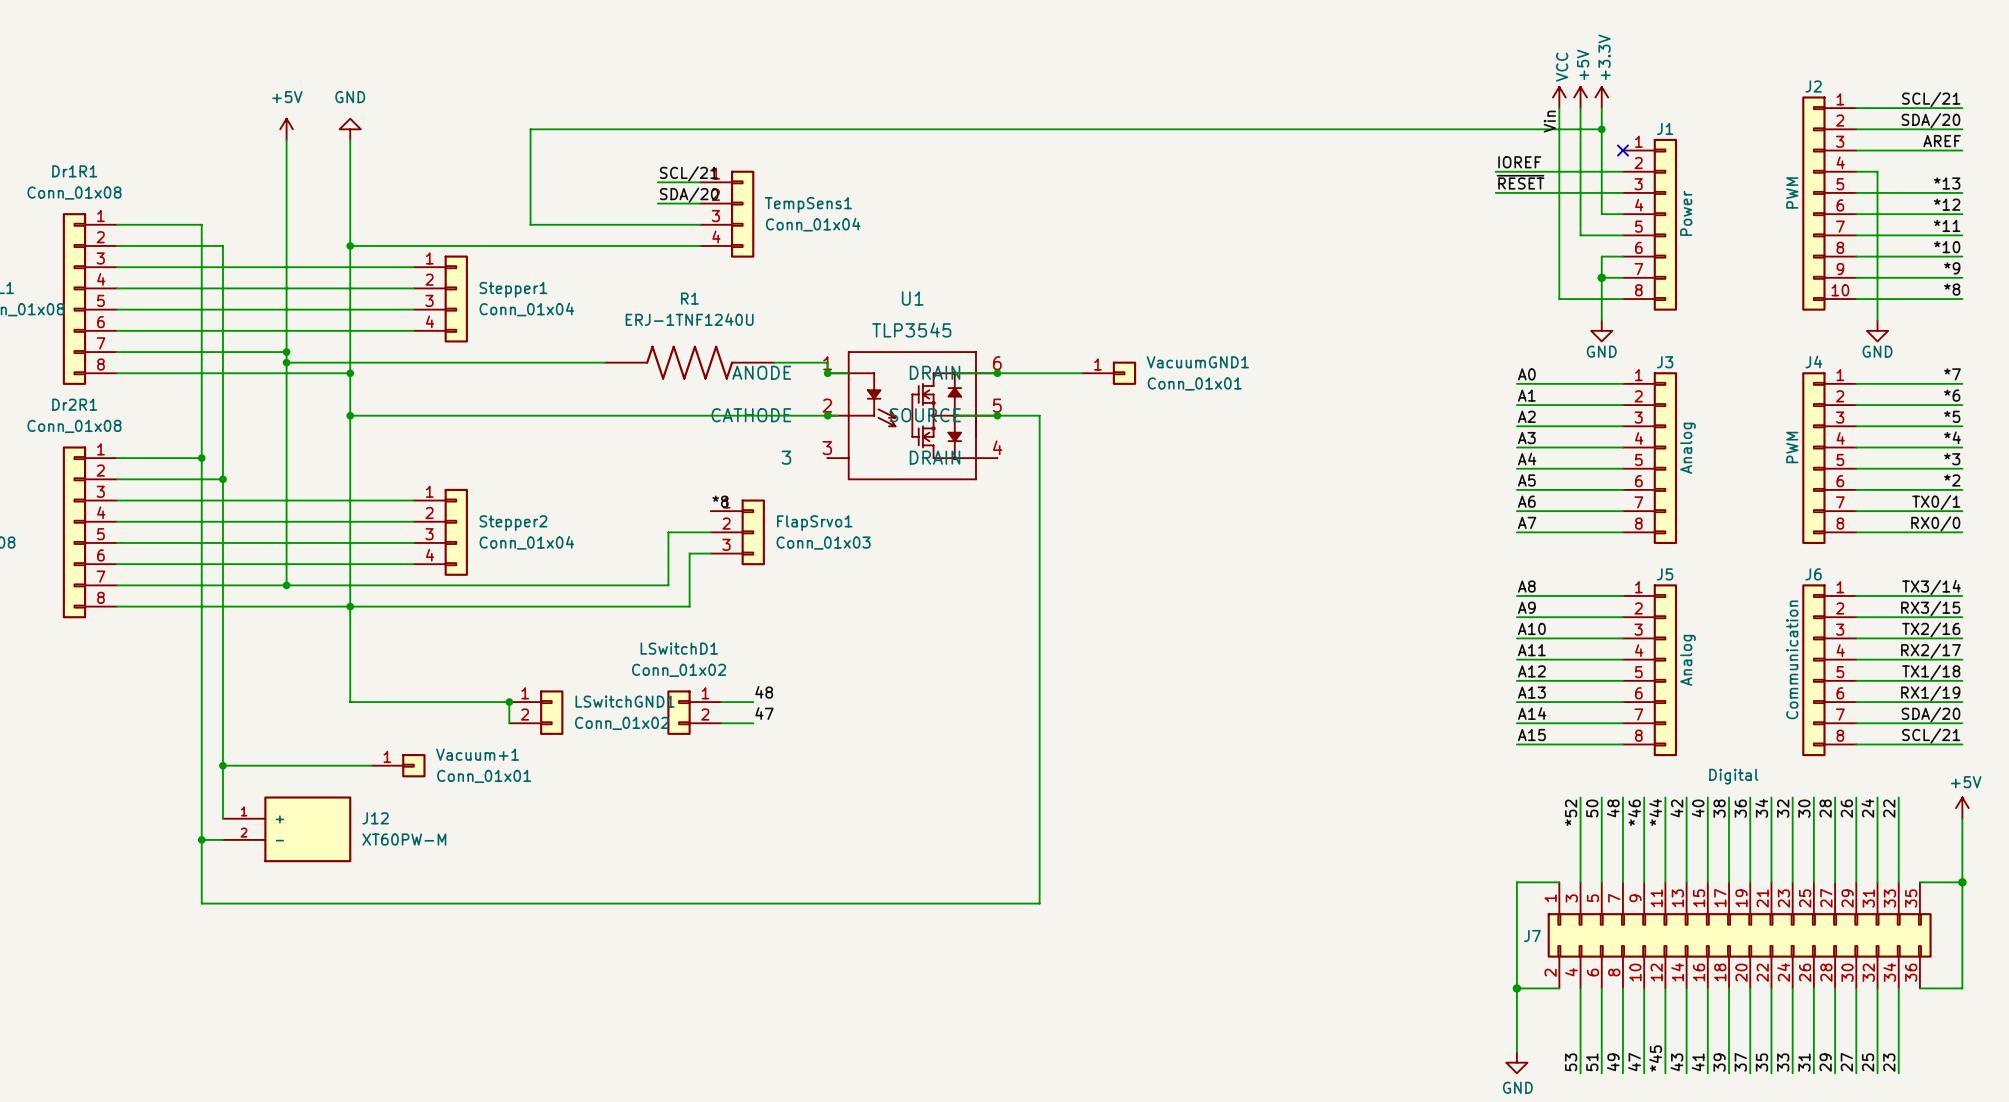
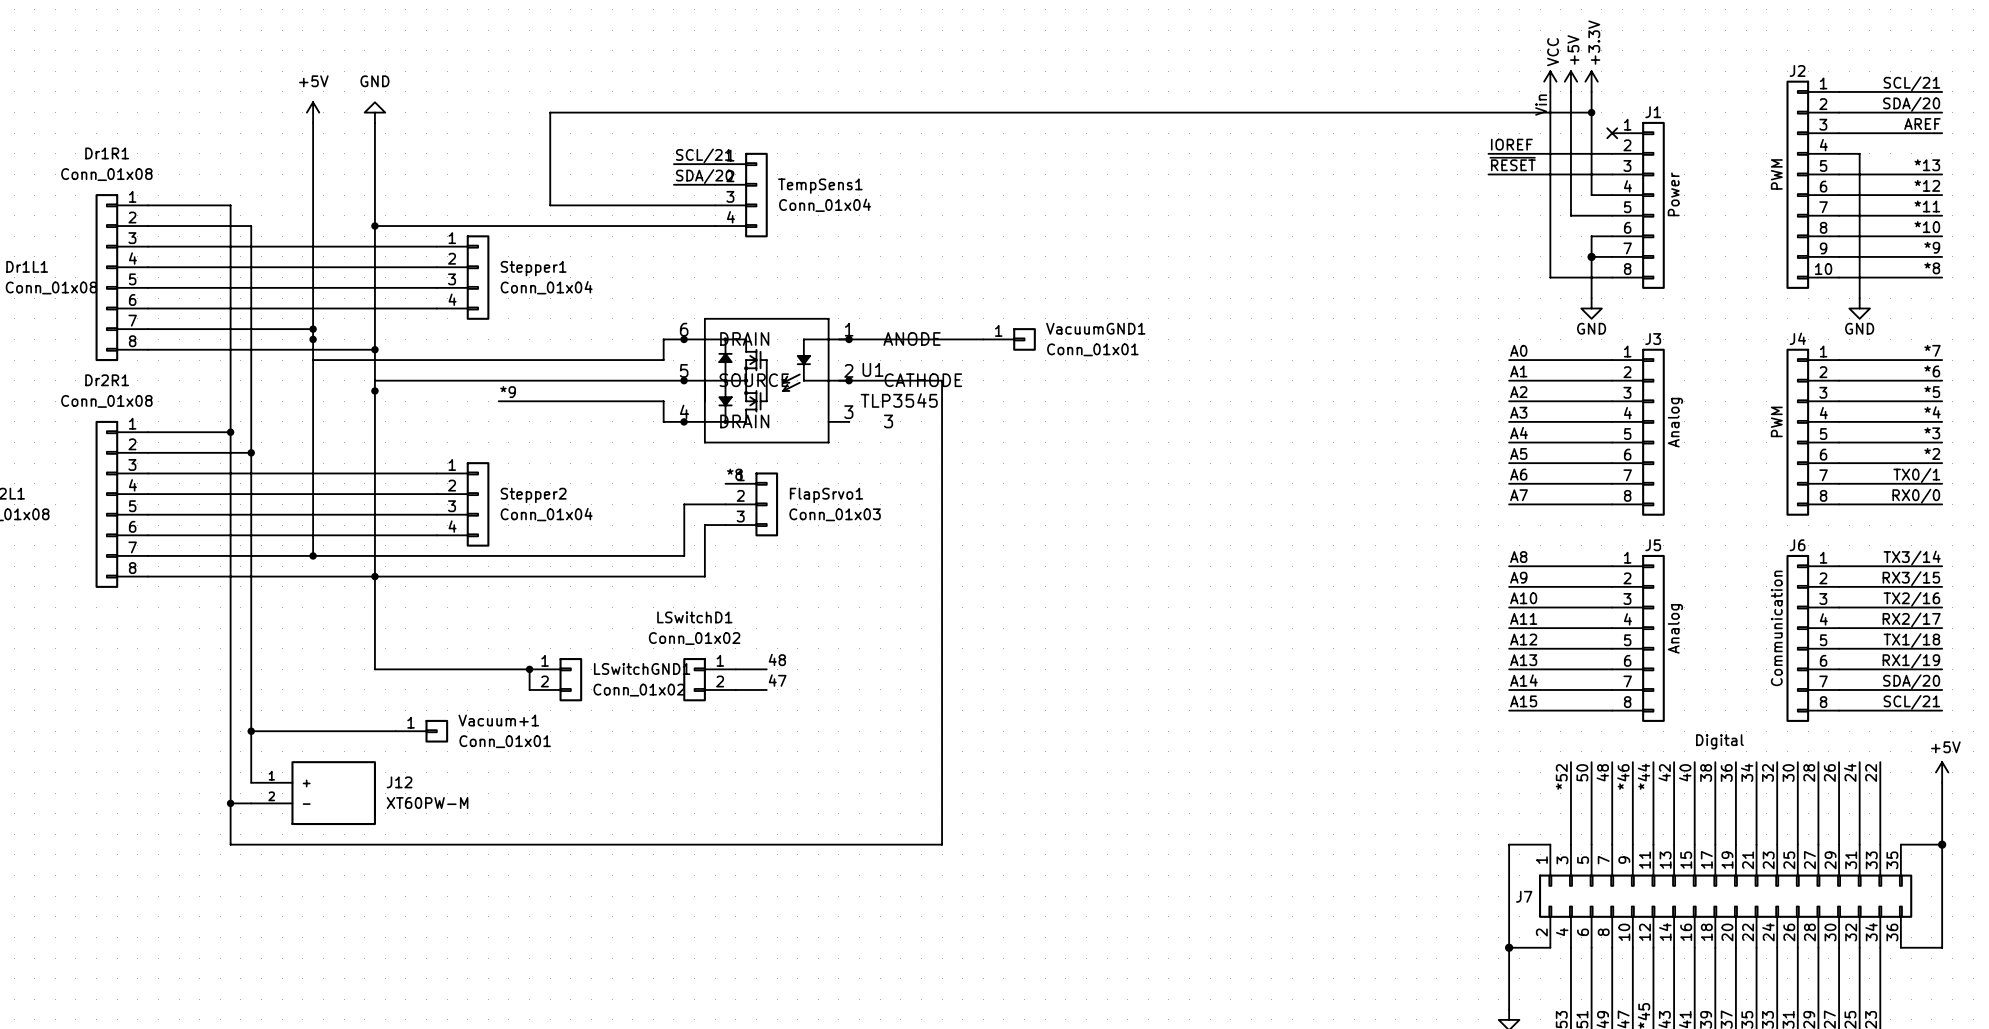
U1 name position: U1 (912, 298) -> U1 (873, 369)
U1 value position: TLP3545 (911, 330) -> TLP3545 (899, 400)
wire: (286, 362) (604, 362) -> (374, 380) (684, 380)
wire: none -> (684, 339) (663, 339) (663, 360) (313, 360)
junction: none -> (684, 339)
R1: ERJ-1TNF1240U (689, 362) -> none
wire: (774, 362) (827, 362) (827, 373) (848, 373) -> none
wire: none -> (838, 339) (983, 339)
junction position: (827, 373) -> (849, 339)
wire: (954, 373) (1082, 373) -> none
junction: (997, 373) -> none
VacuumGND1 position: (1109, 373) -> (1009, 339)
junction: none -> (684, 380)
wire: (350, 415) (838, 415) -> none
junction position: (827, 415) -> (849, 380)
U1 flip: as is (912, 415) -> left-right (766, 380)
U1 position: (912, 415) -> (766, 380)
wire: (954, 415) (1039, 415) (1039, 903) (201, 903) (201, 882) -> (838, 380) (942, 380) (942, 844) (230, 844)
junction: (997, 415) -> none
label: none -> *9 (508, 392)
wire: none -> (498, 401) (663, 401) (663, 421) (684, 421)
junction: none -> (684, 421)

